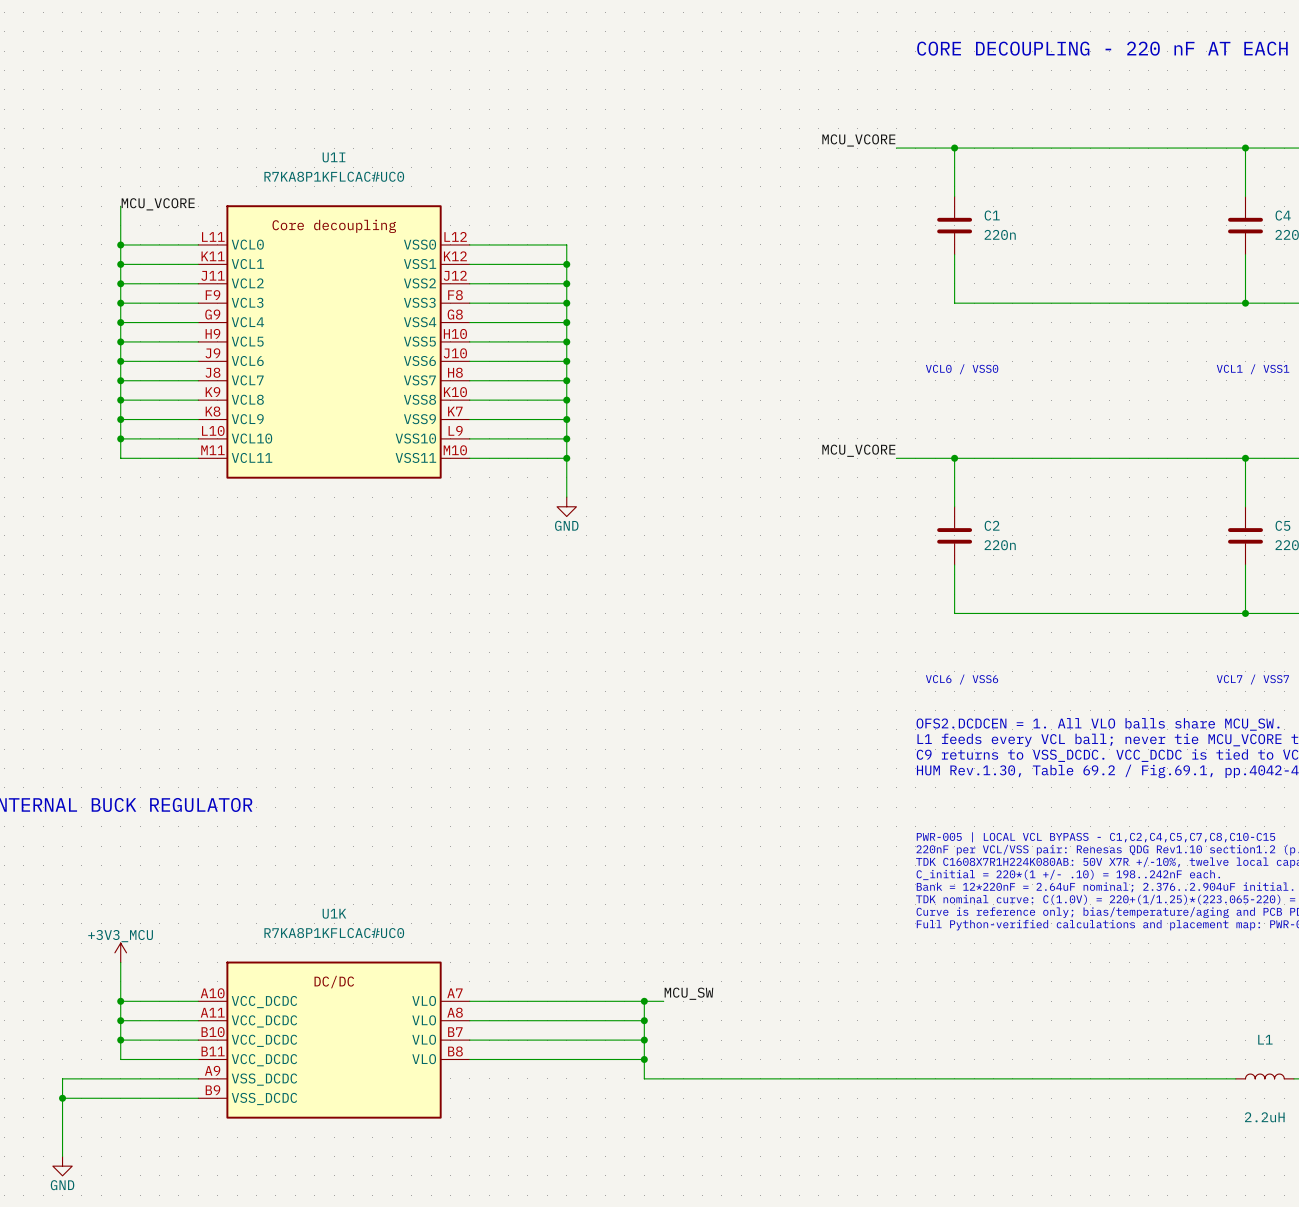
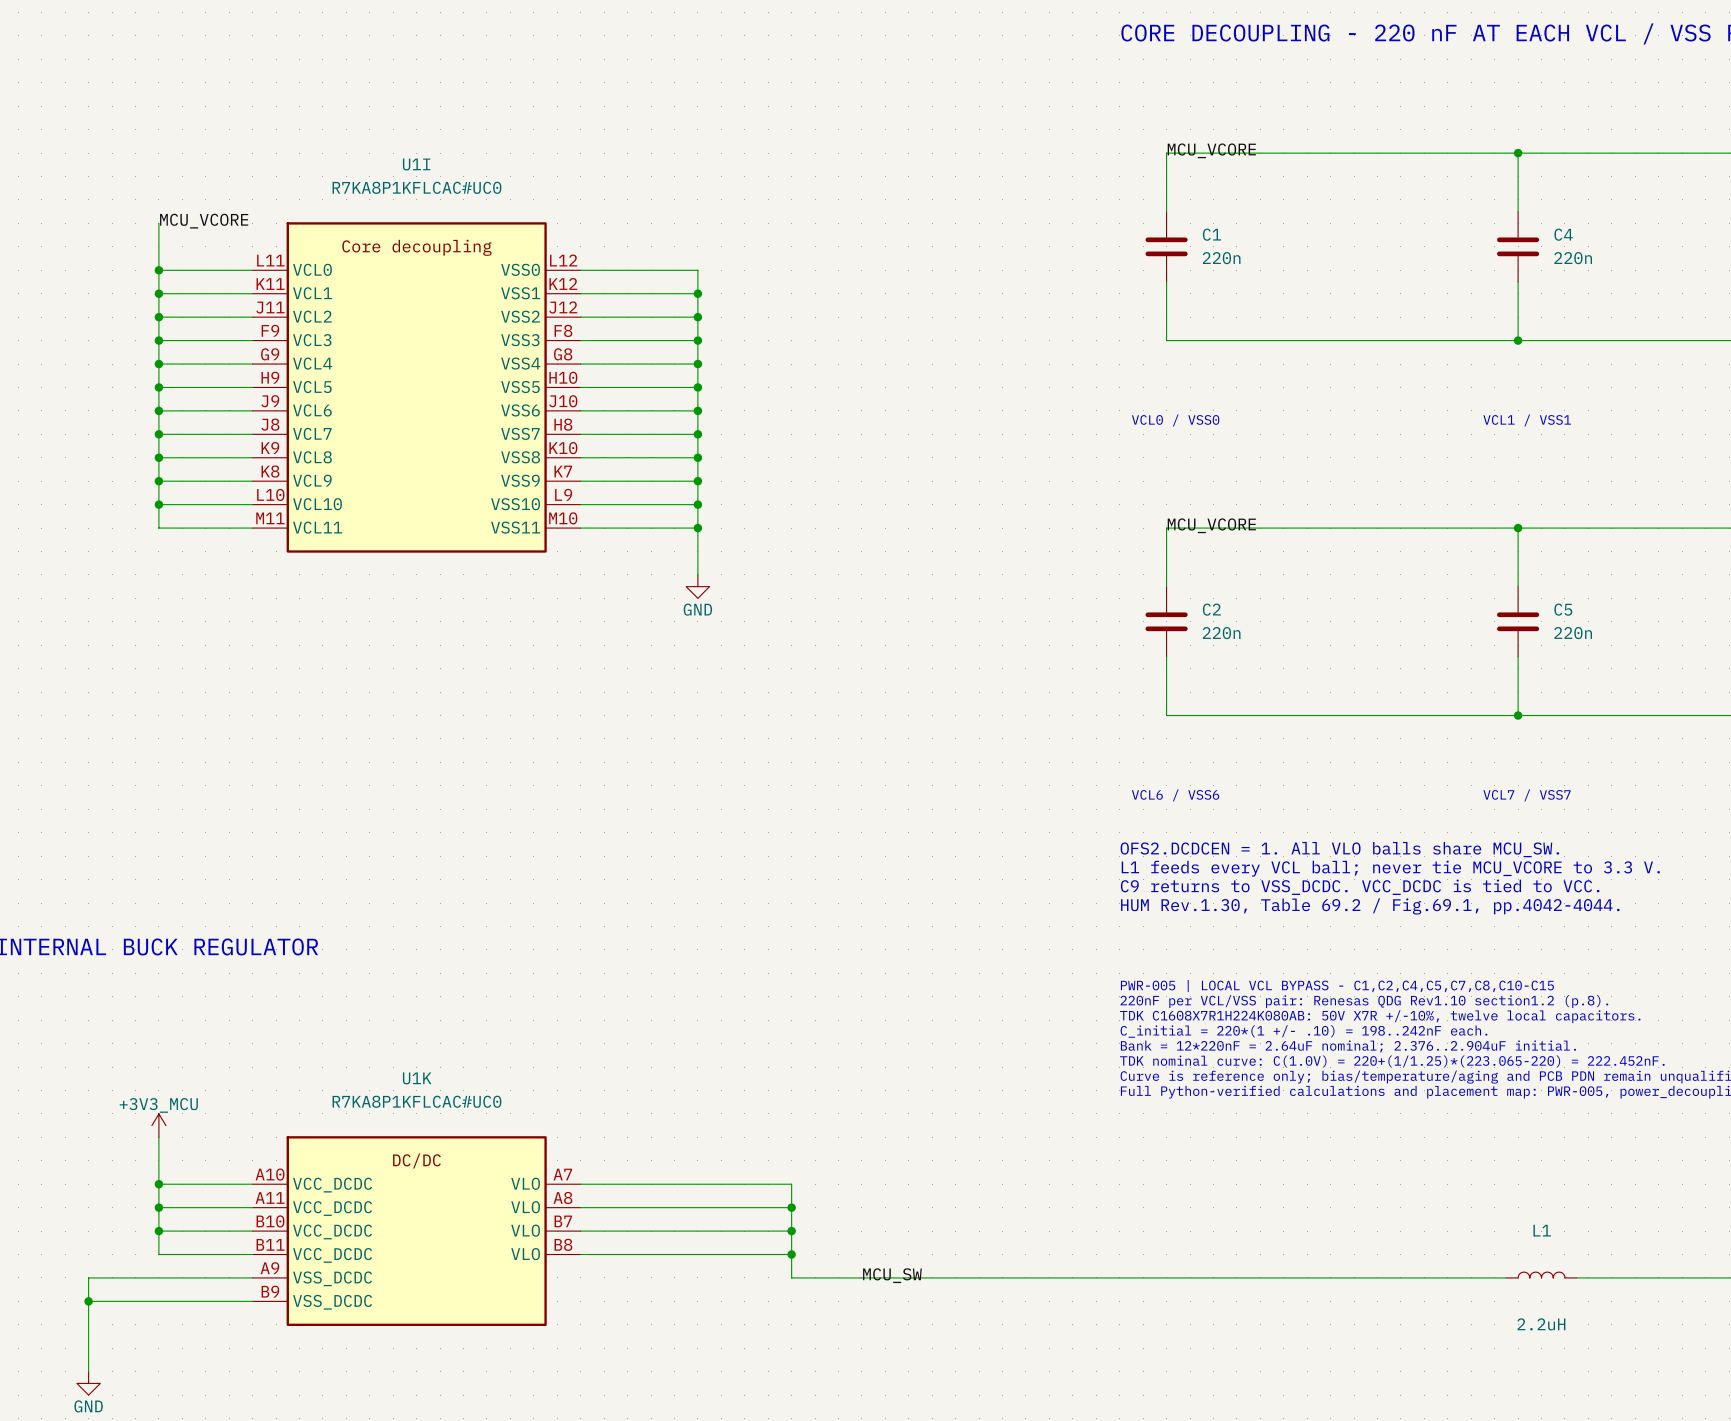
label position: MCU_VCORE (858, 140) -> MCU_VCORE (1211, 150)
wire: (896, 148) (954, 148) -> none
junction: (954, 148) -> none
label position: MCU_VCORE (858, 450) -> MCU_VCORE (1211, 525)
wire: (896, 458) (954, 458) -> none
junction: (954, 458) -> none
label position: MCU_SW (688, 993) -> MCU_SW (892, 1275)
wire: (644, 1001) (663, 1001) -> none
junction: (644, 1001) -> none

